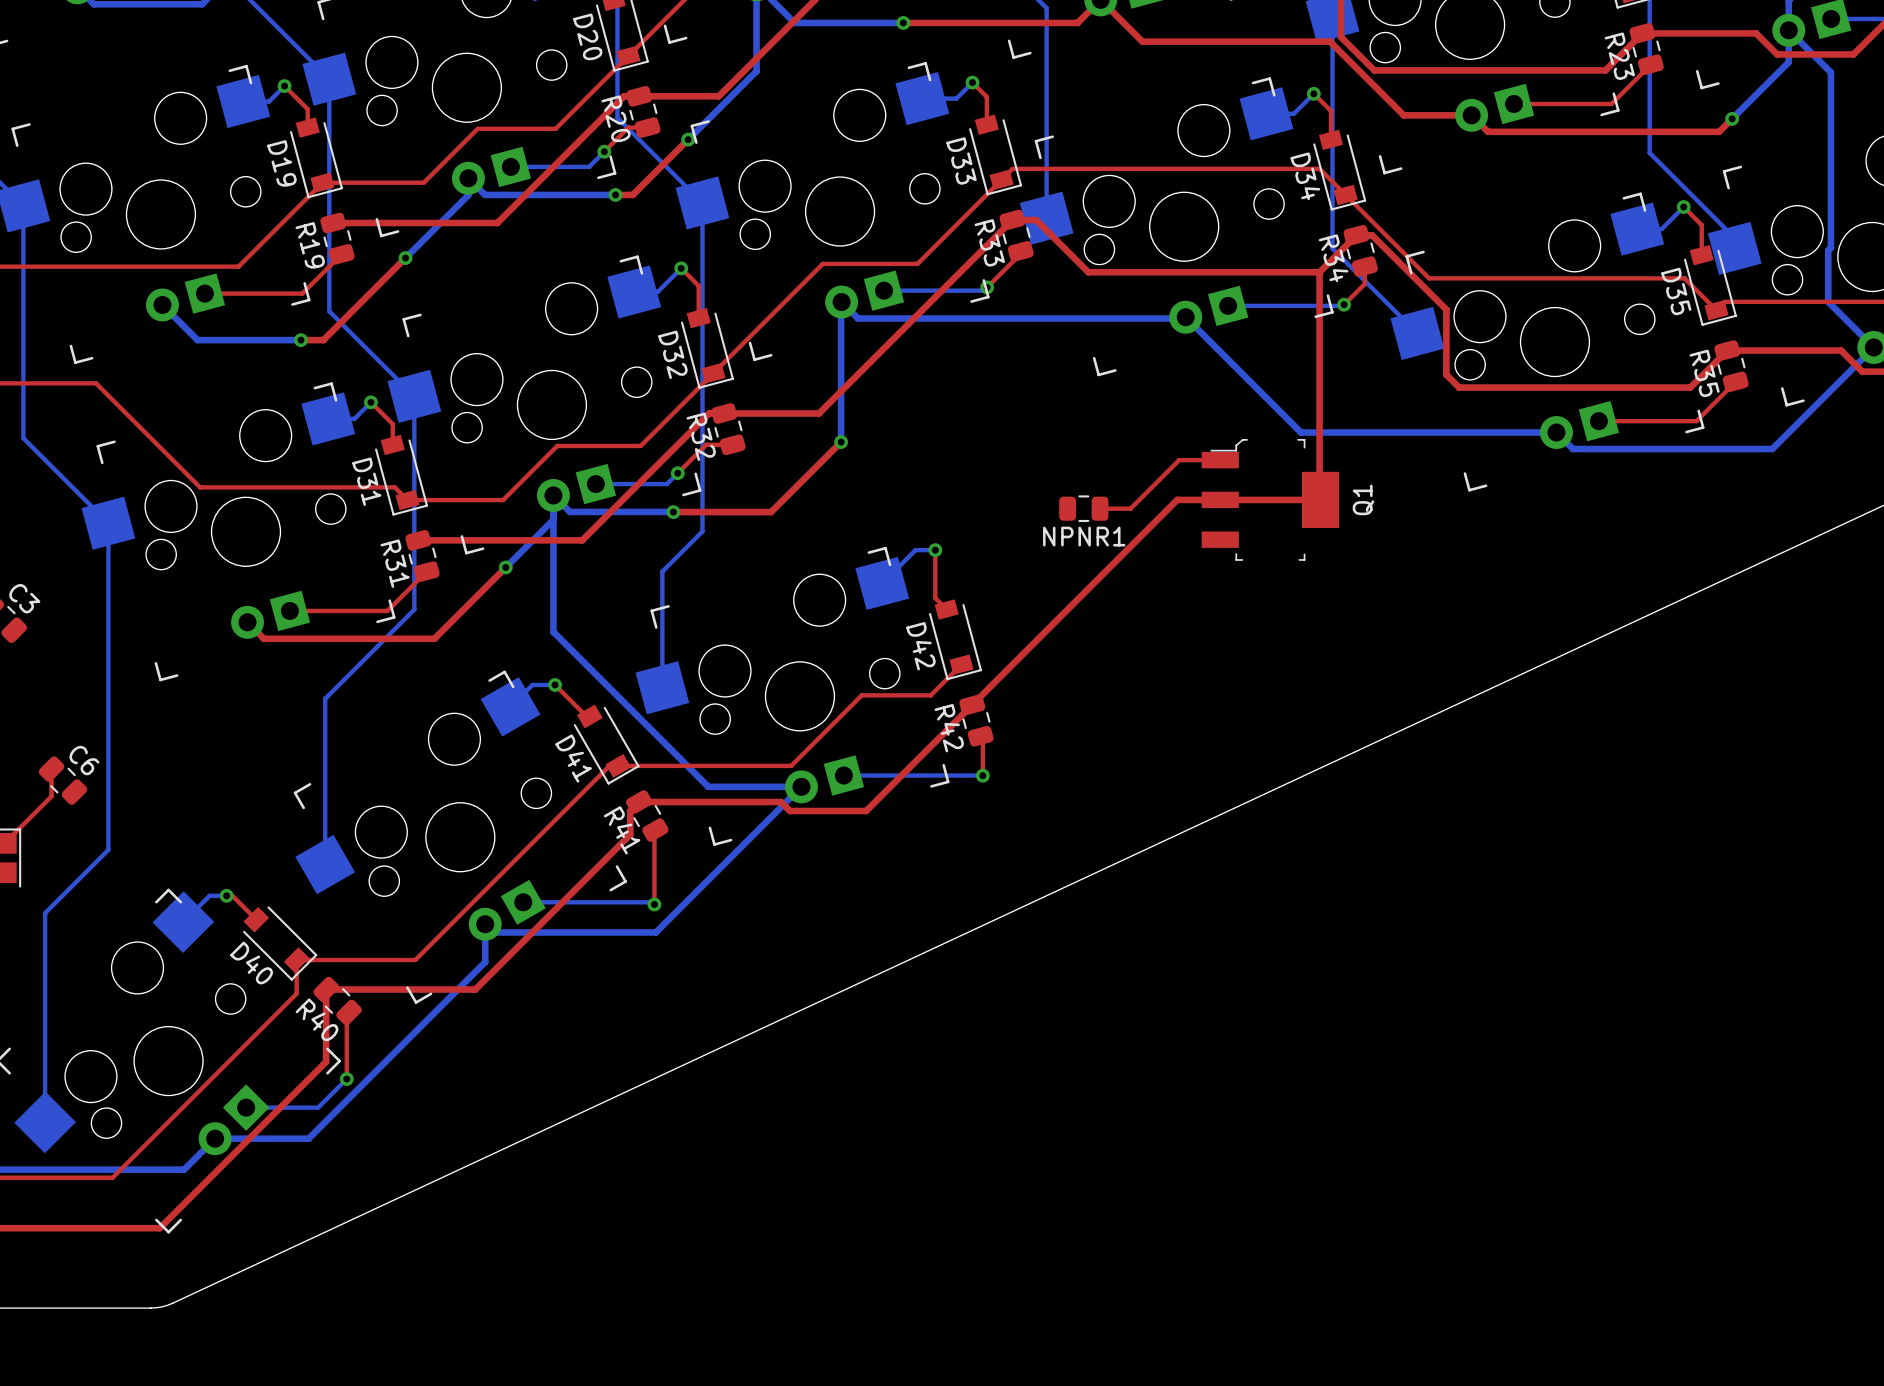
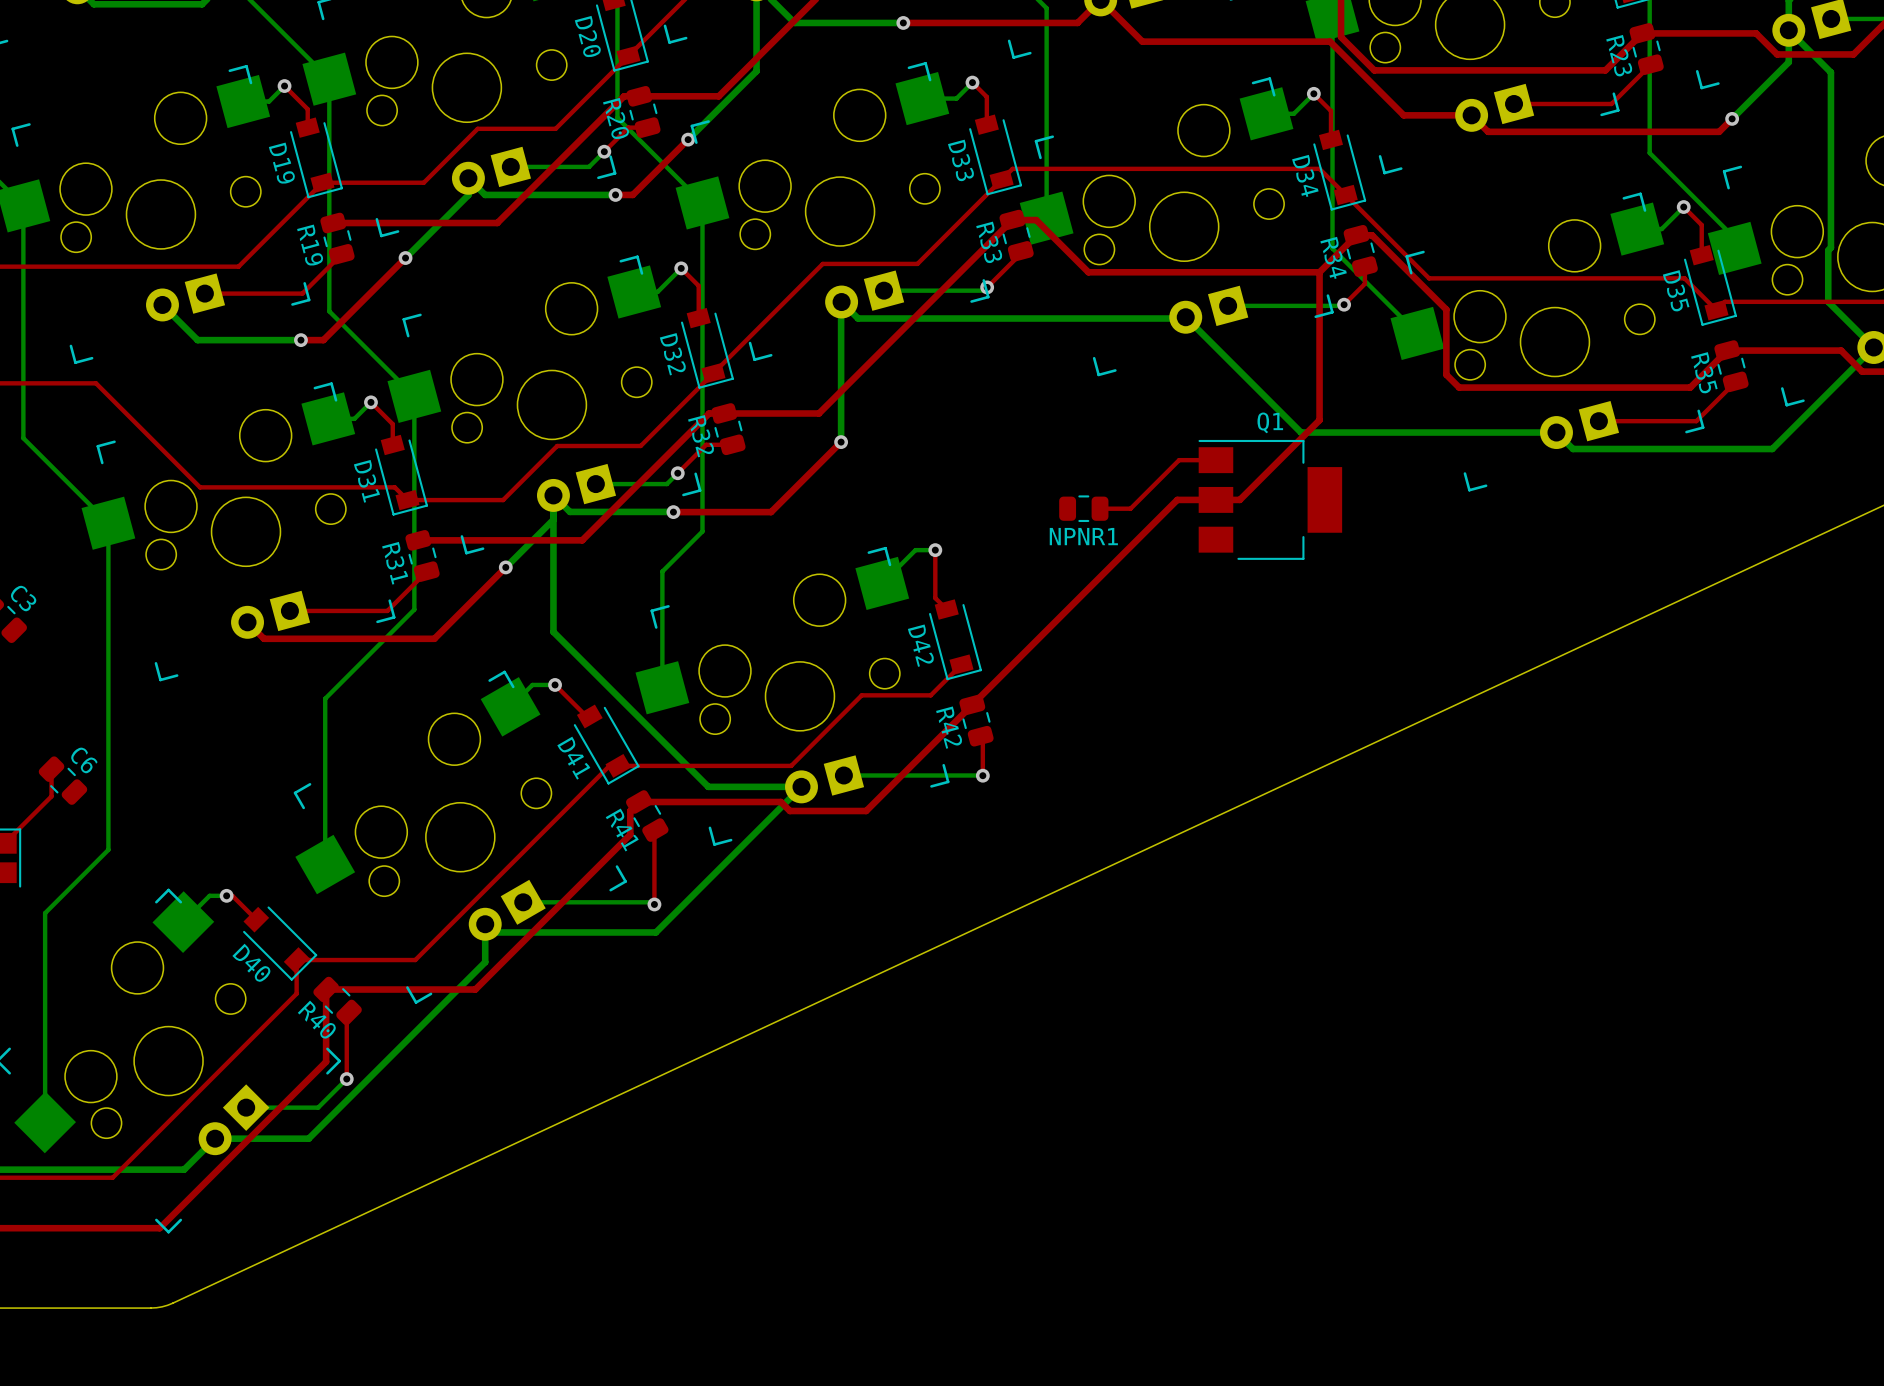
top track: (1319, 420) (1319, 498) -> (1319, 420) (1239, 499)
Q1 footprint: [1201, 438, 1340, 561] -> [1198, 439, 1343, 560]
top track: (1239, 499) (1320, 499) -> none
Q1 name position: Q1 (1363, 499) -> Q1 (1270, 422)

